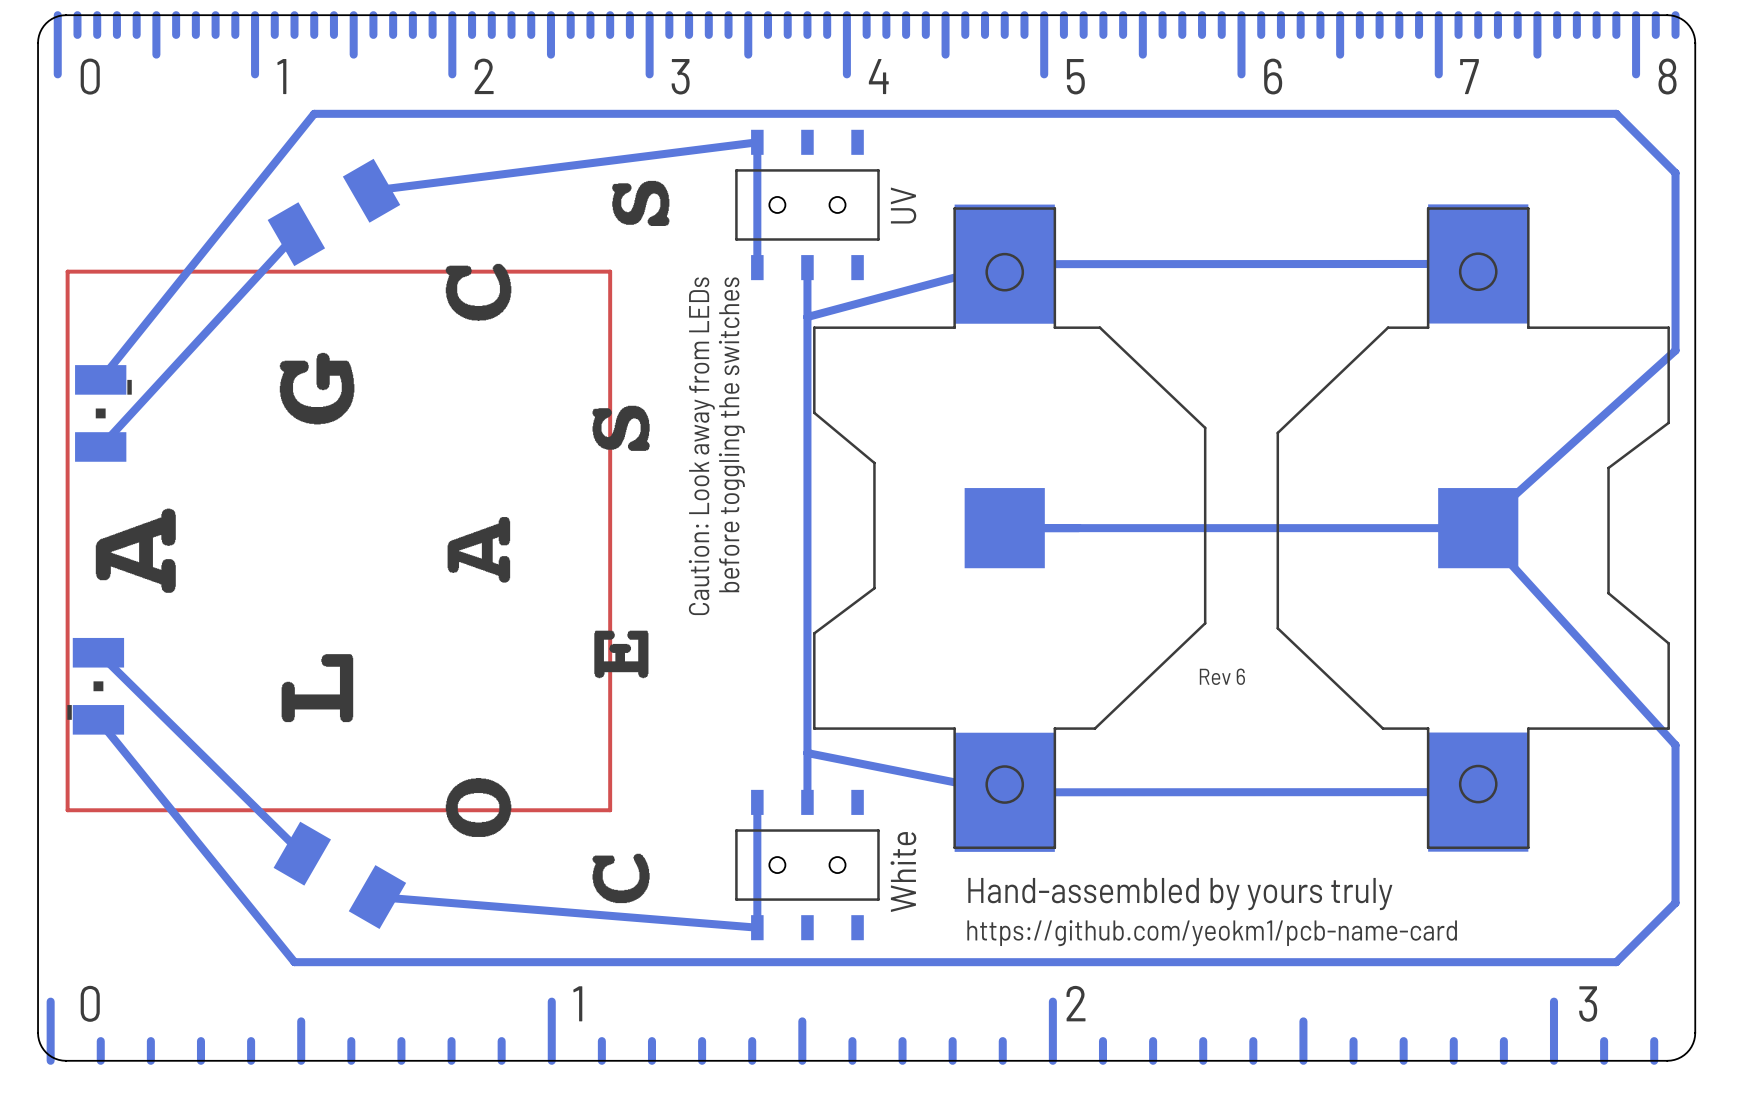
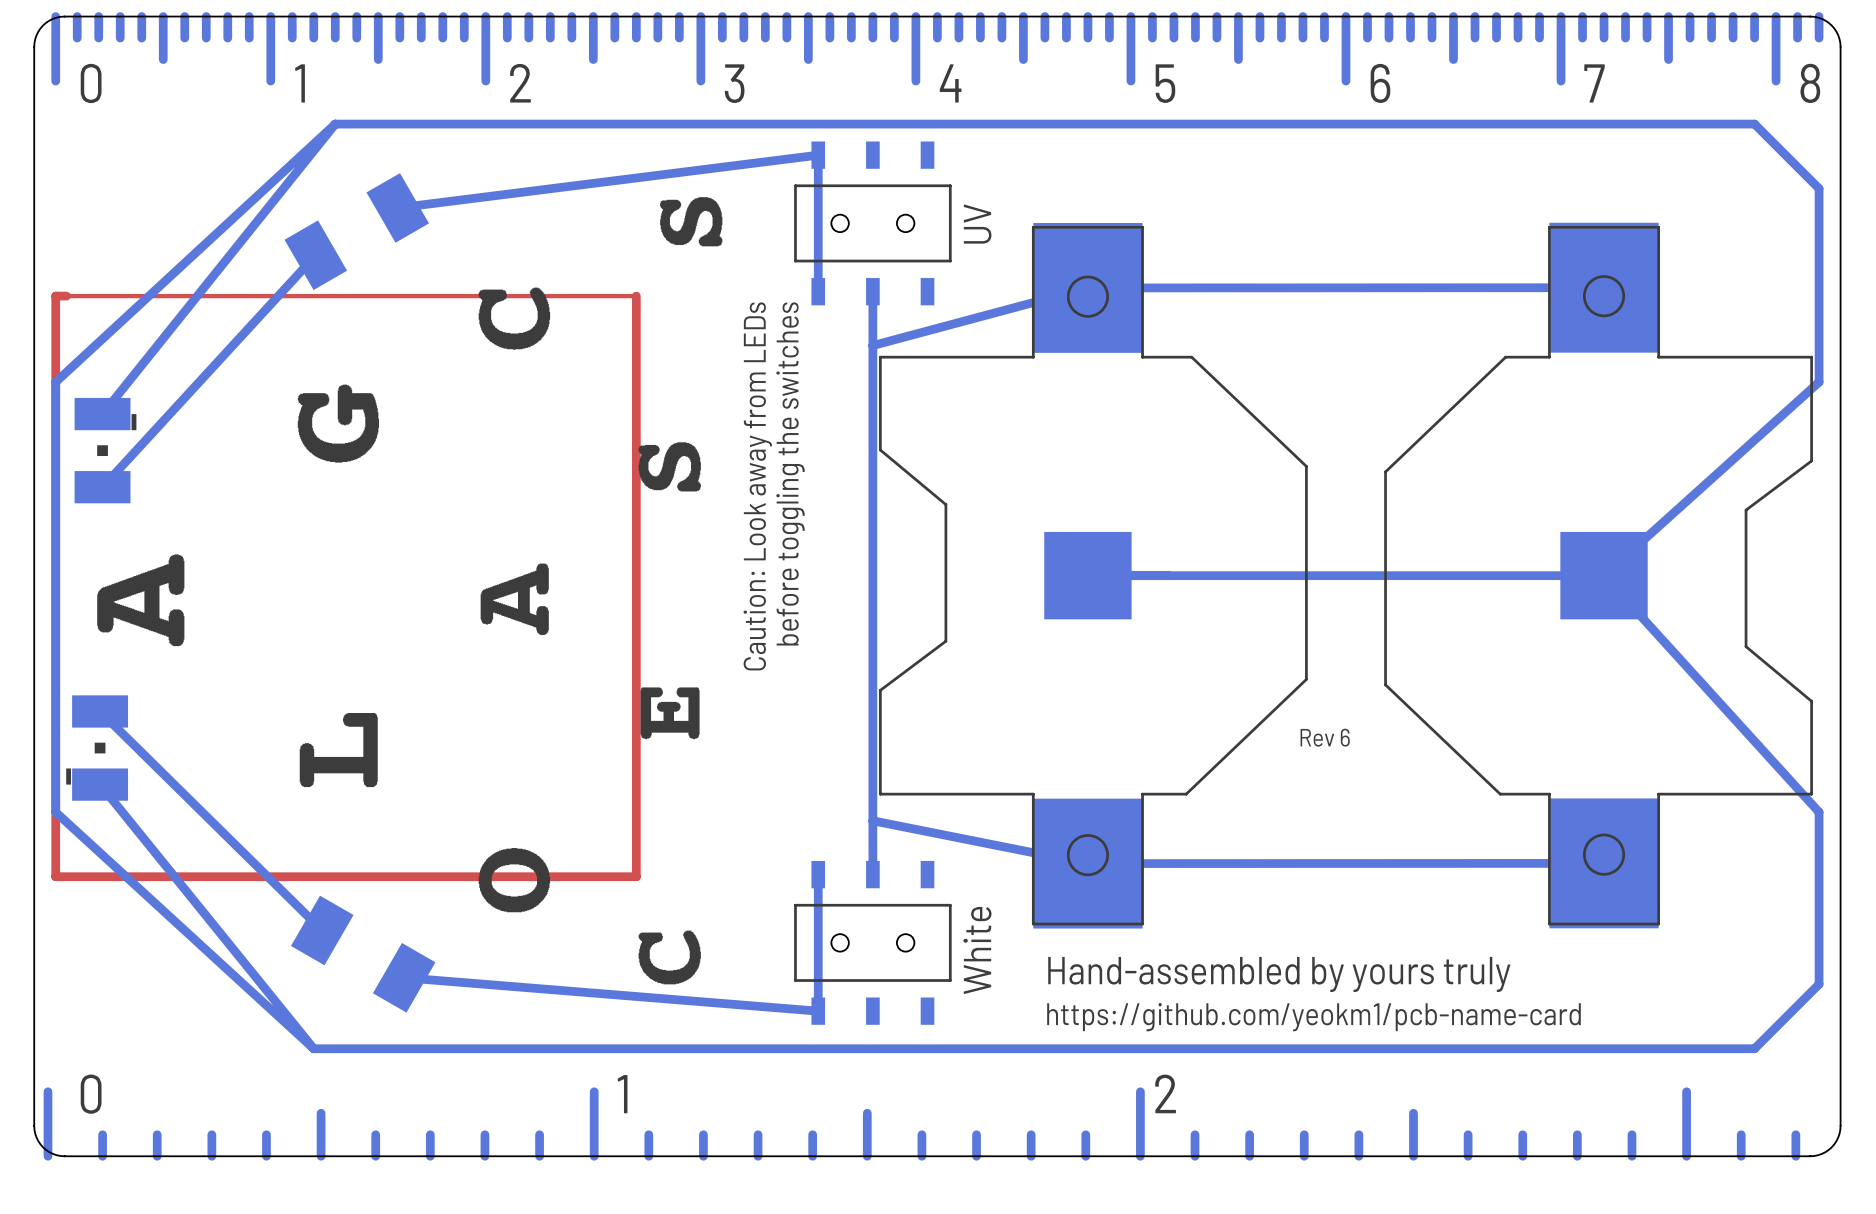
bottom track: none -> (335, 124) (55, 382) (55, 812) (313, 1048)
top track: (590, 271) (610, 271) (610, 810) (67, 810) (67, 271) -> (636, 296) (636, 876) (55, 876) (55, 296) (66, 296)
text: 3 (1588, 1004) -> none

